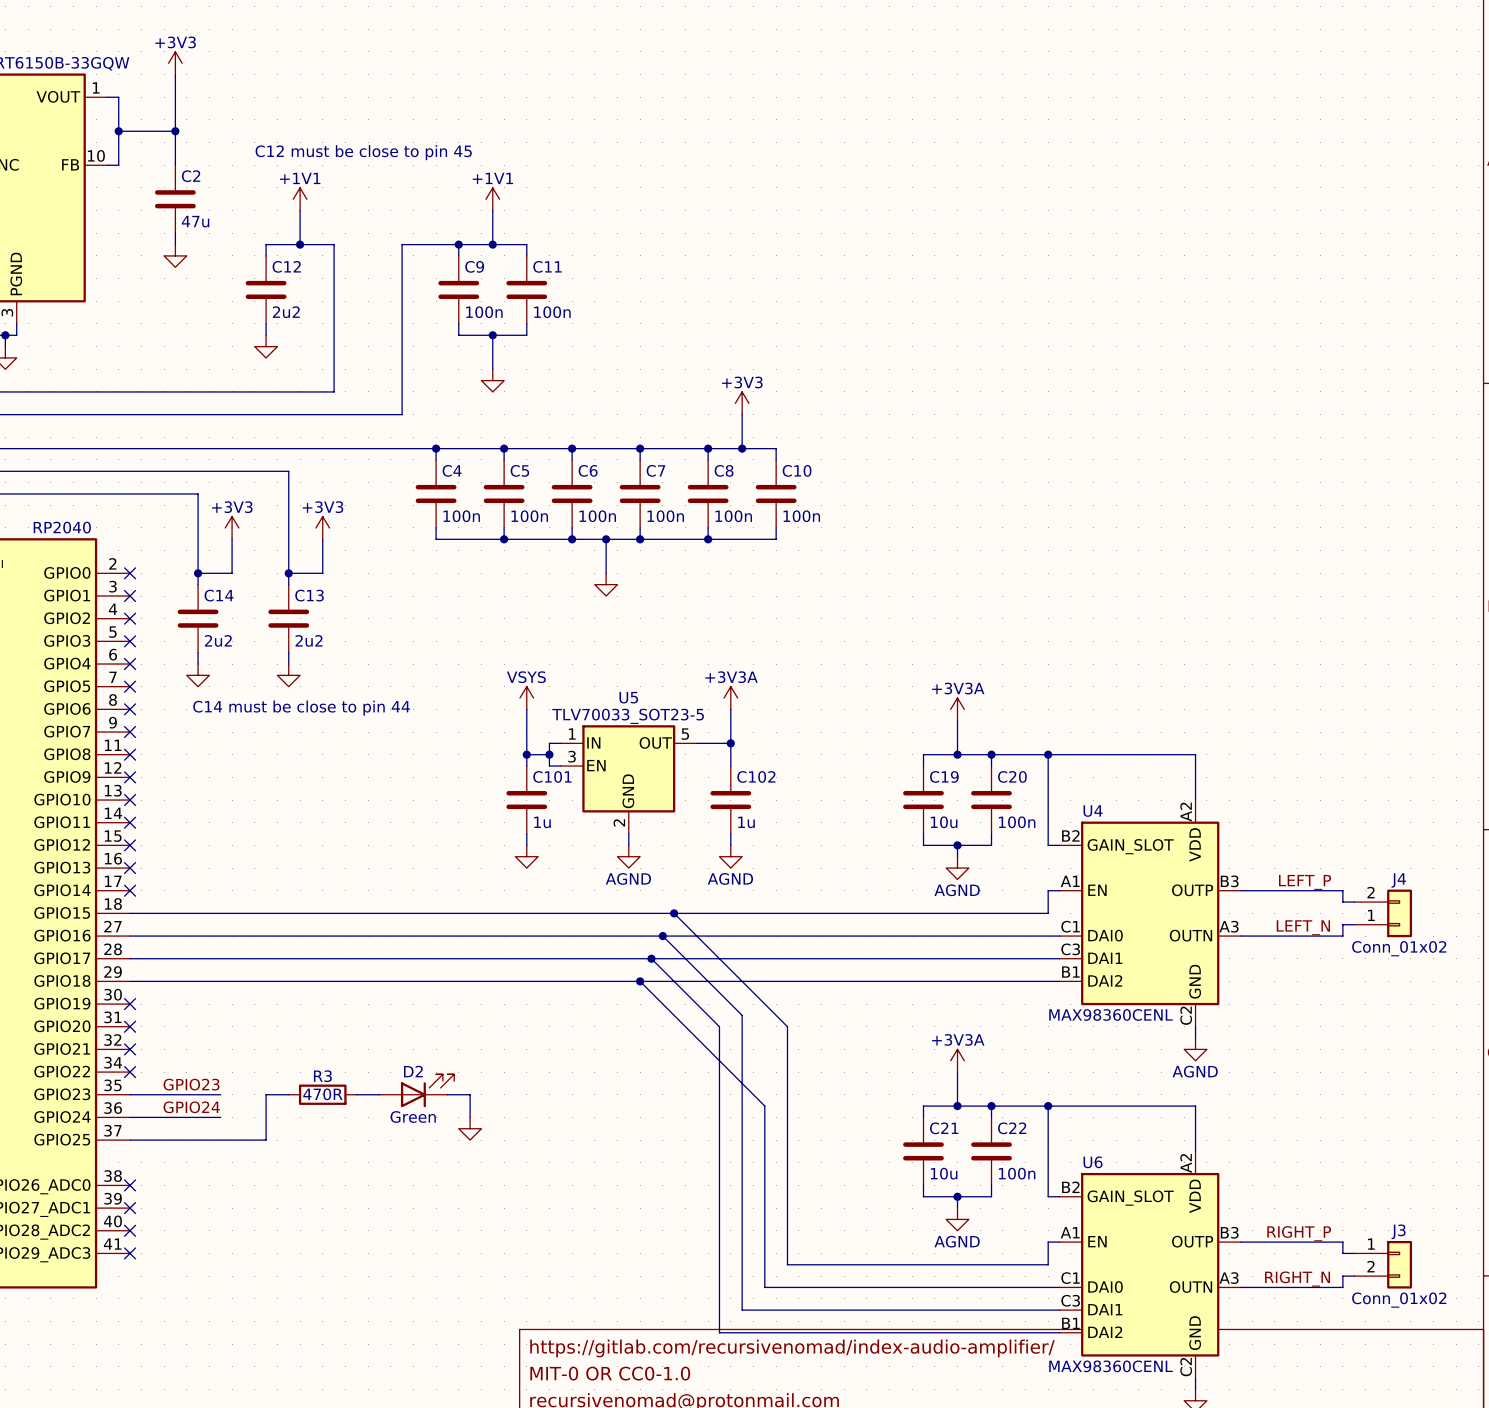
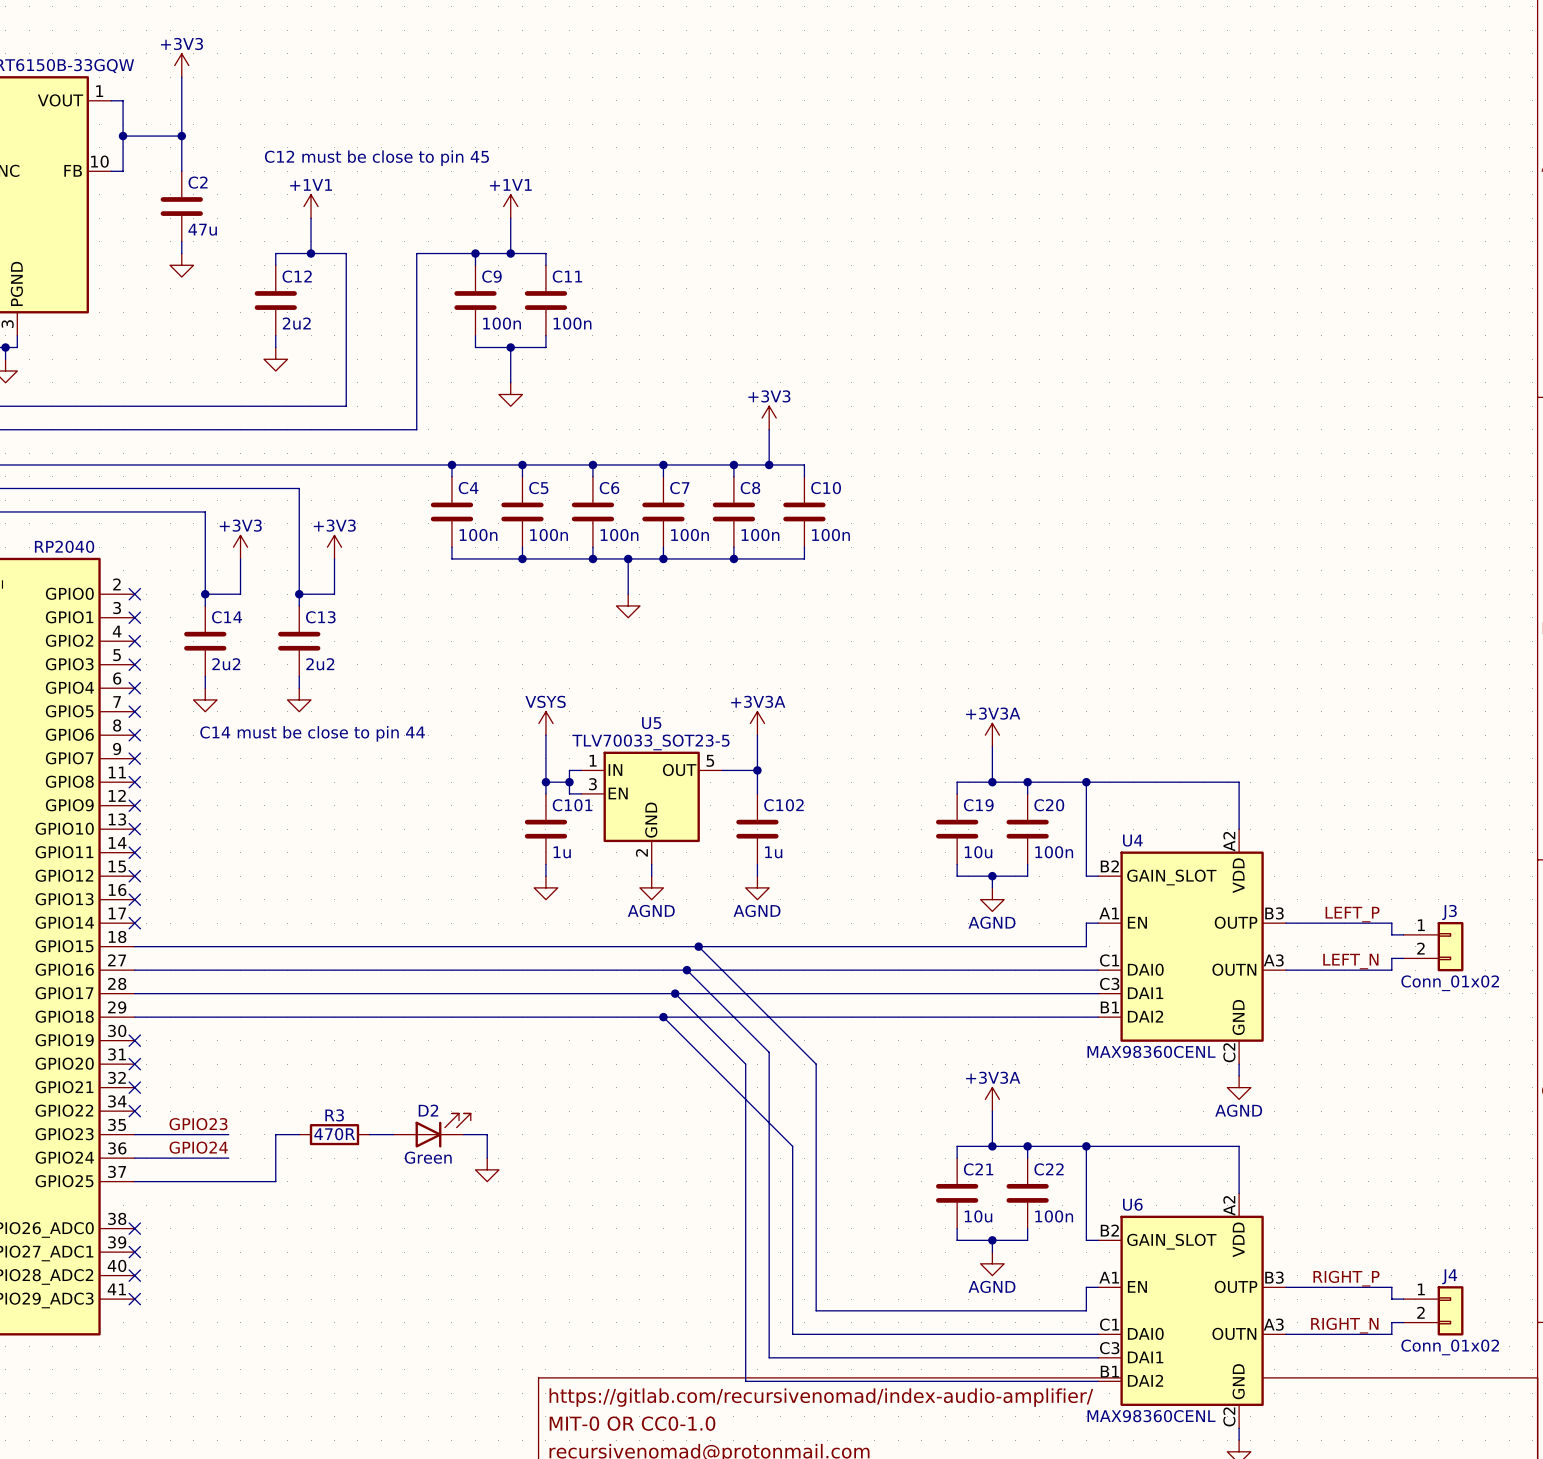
J4 name: J4 (1398, 880) -> J3 (1449, 912)
J4 flip: as is (1399, 913) -> up-down (1450, 946)
J3 name: J3 (1398, 1231) -> J4 (1449, 1276)

